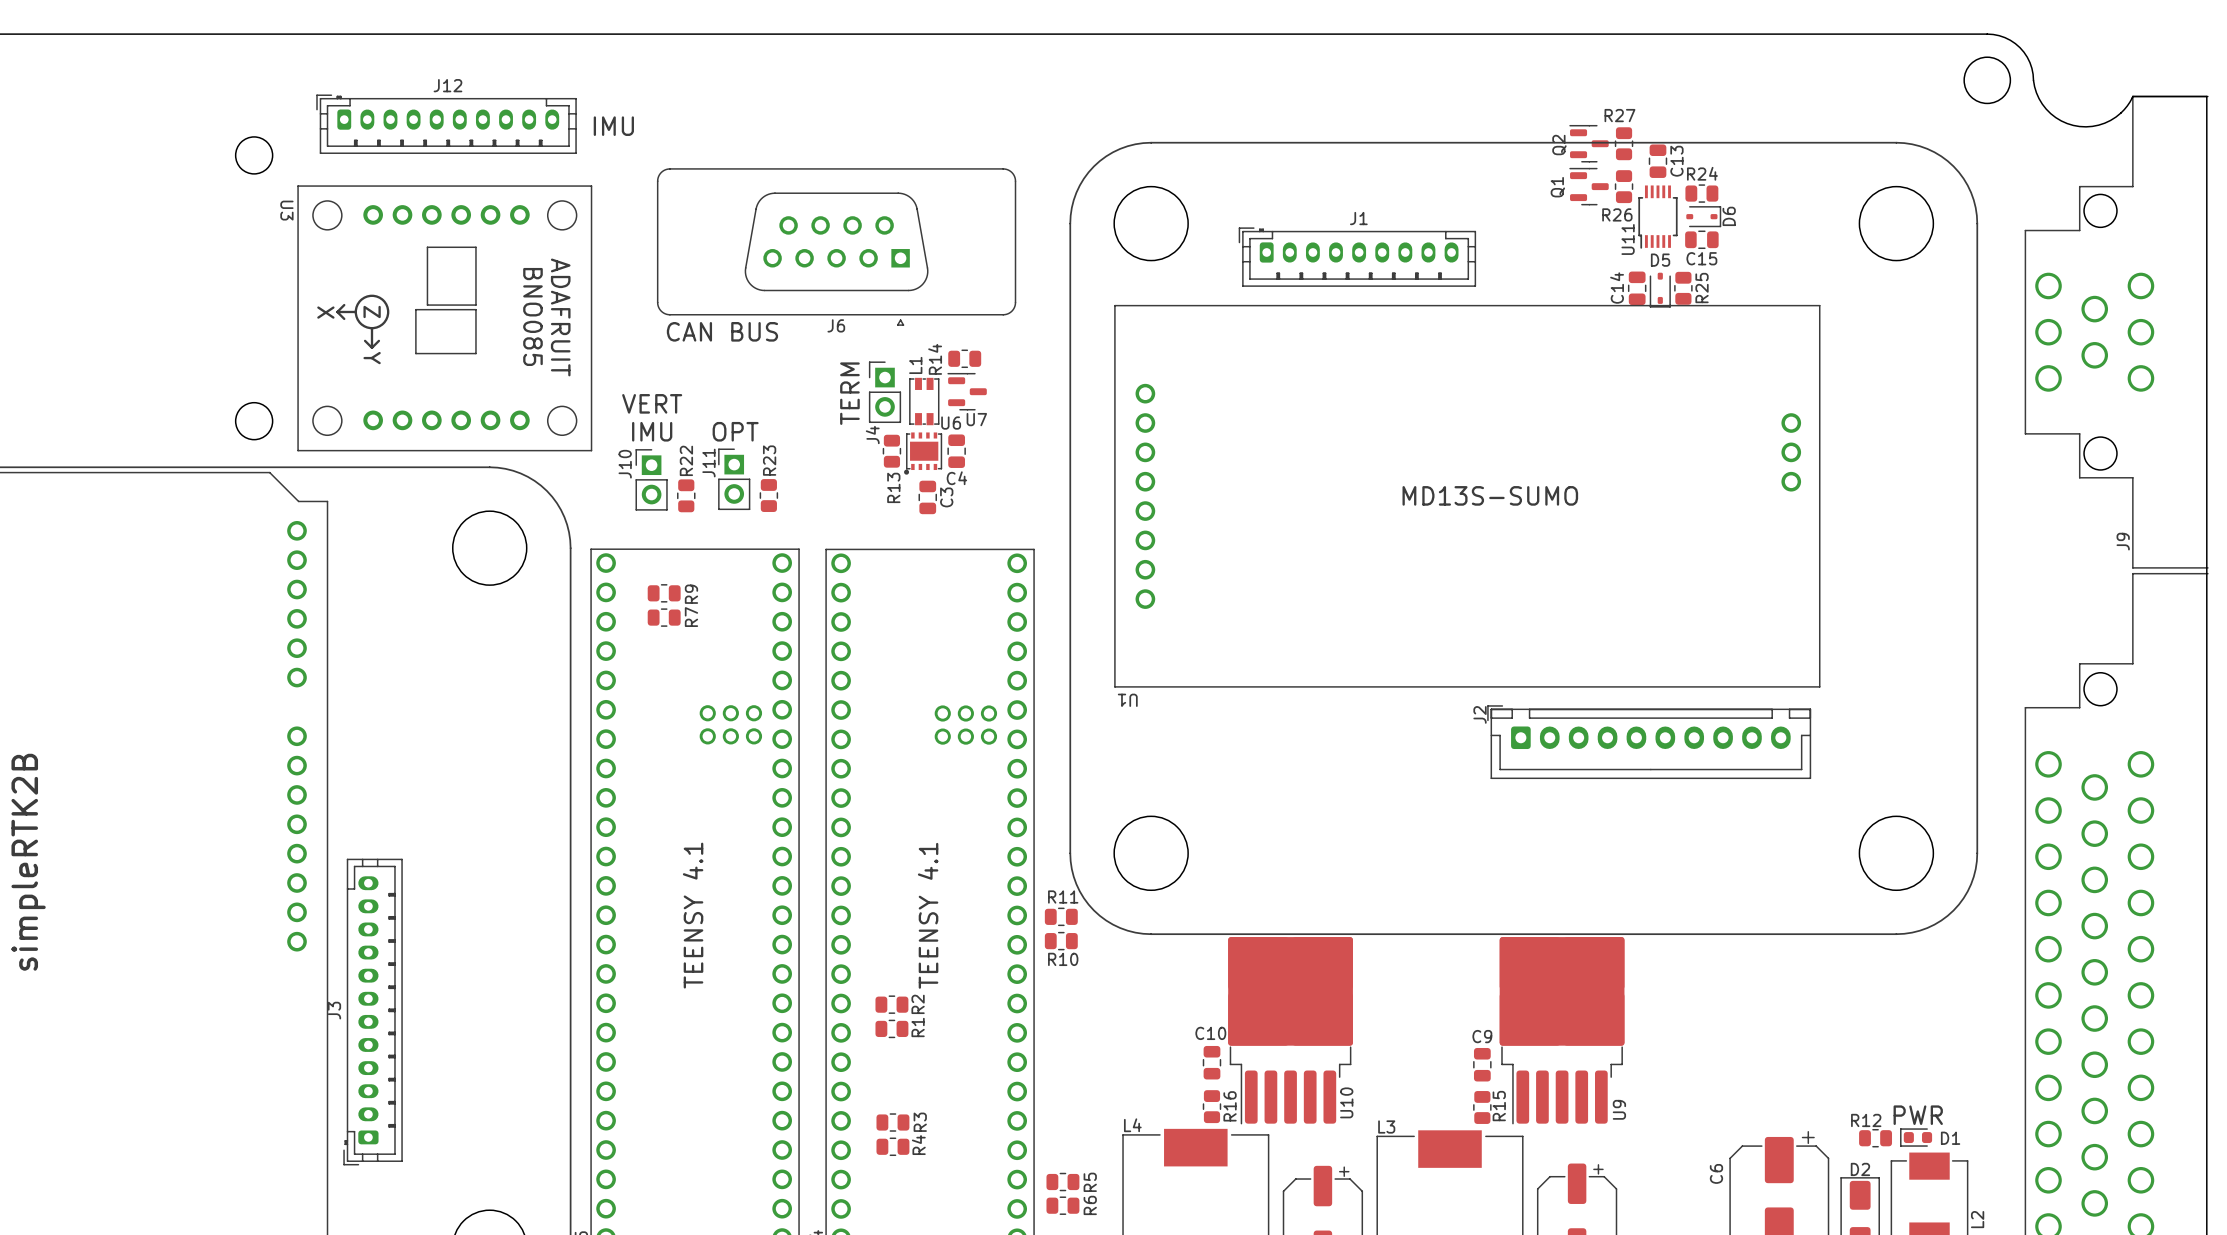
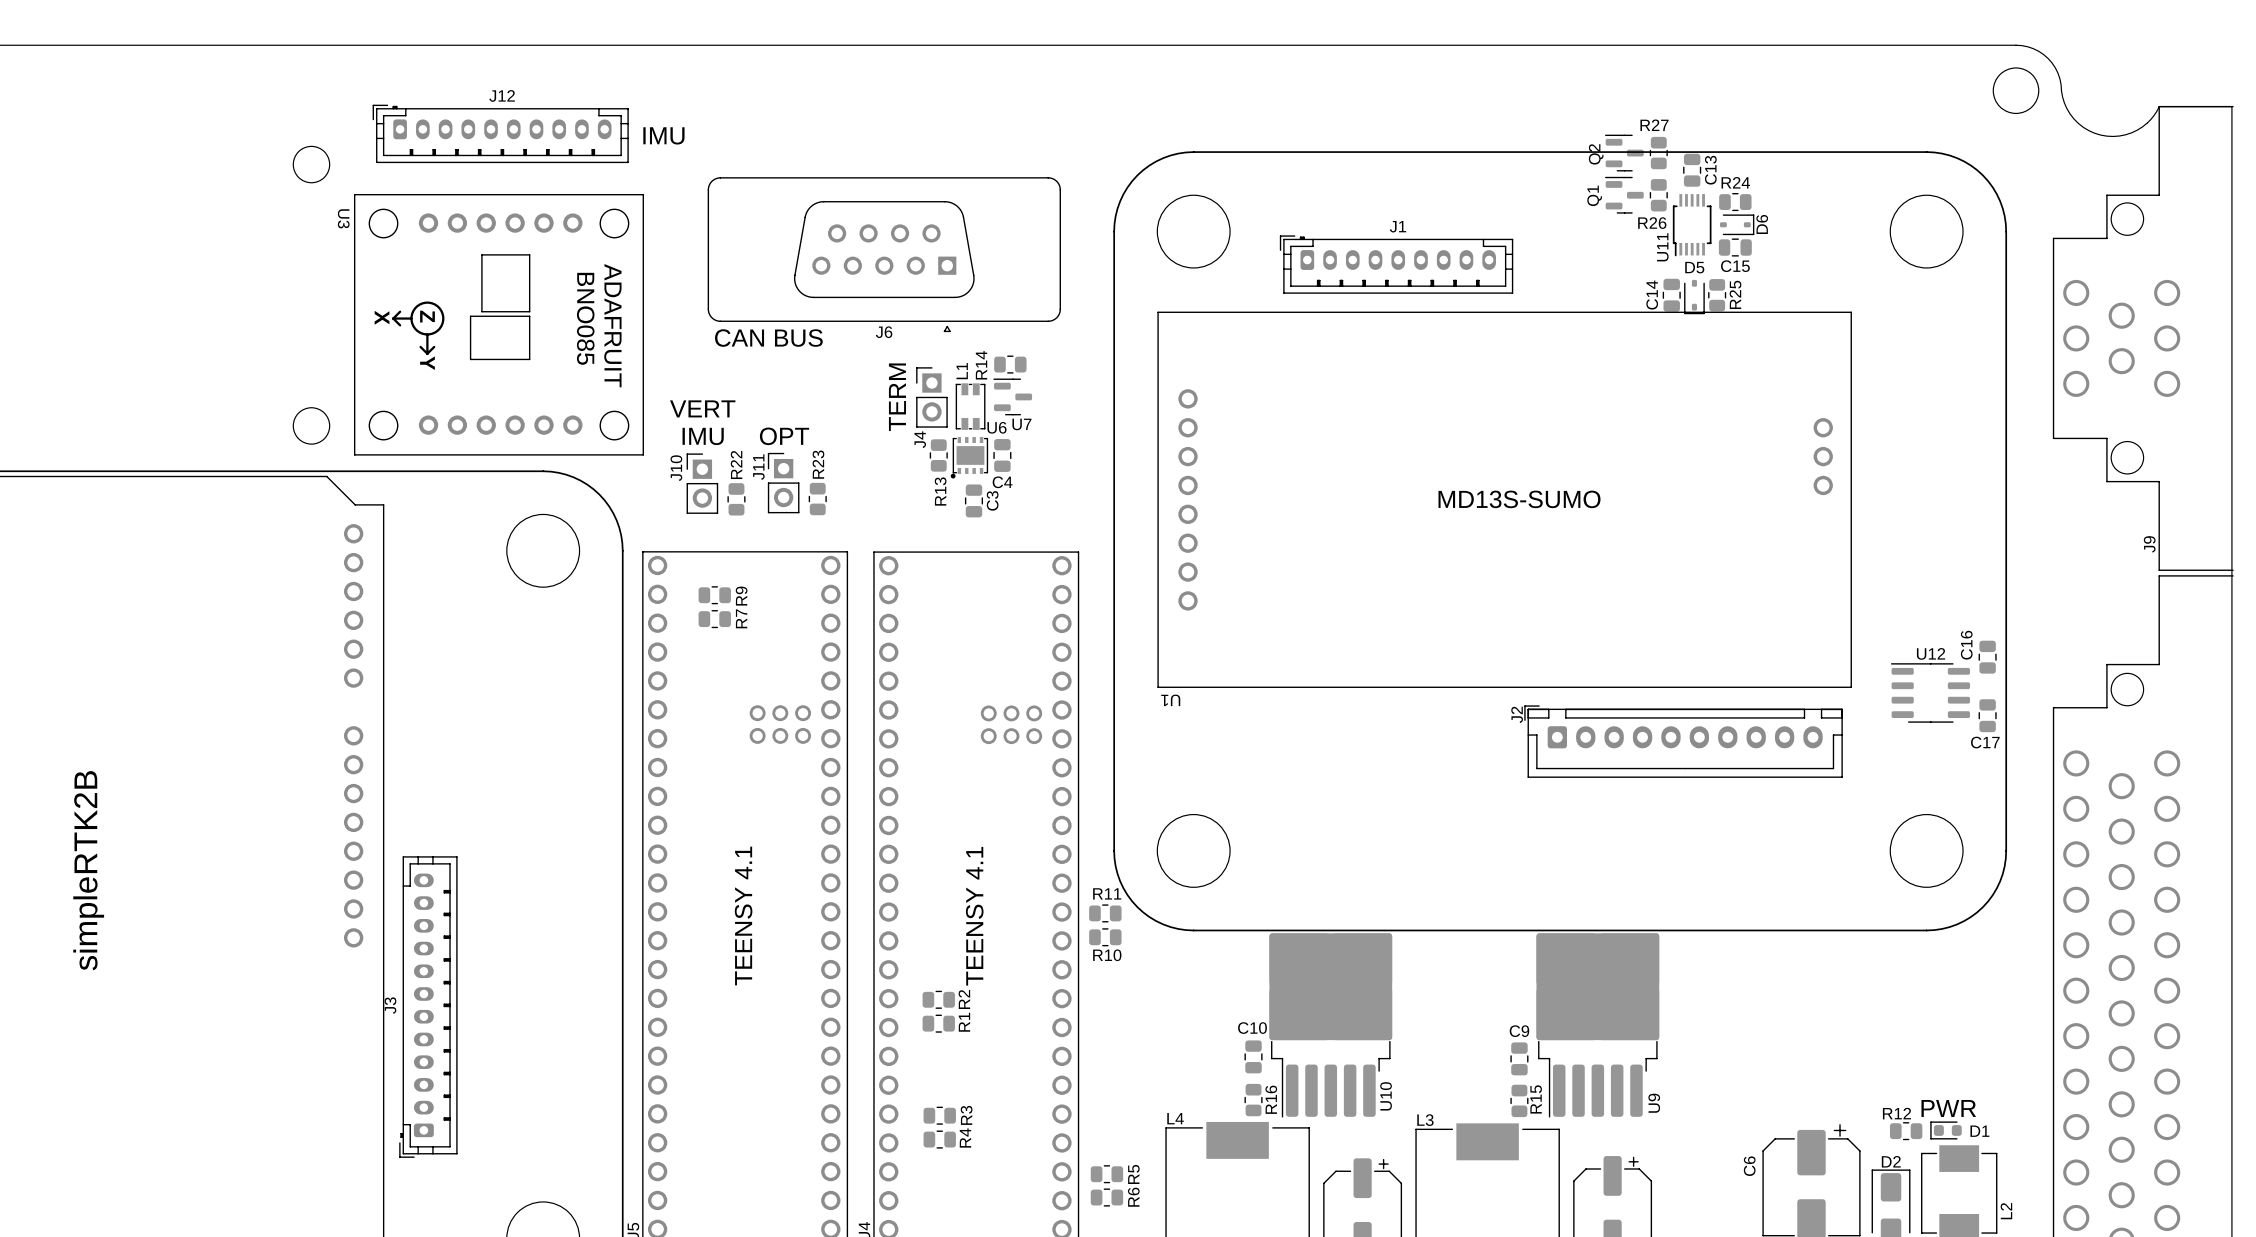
C16: none -> (1987, 657)
U12: none -> (1930, 692)
C17: none -> (1987, 715)

